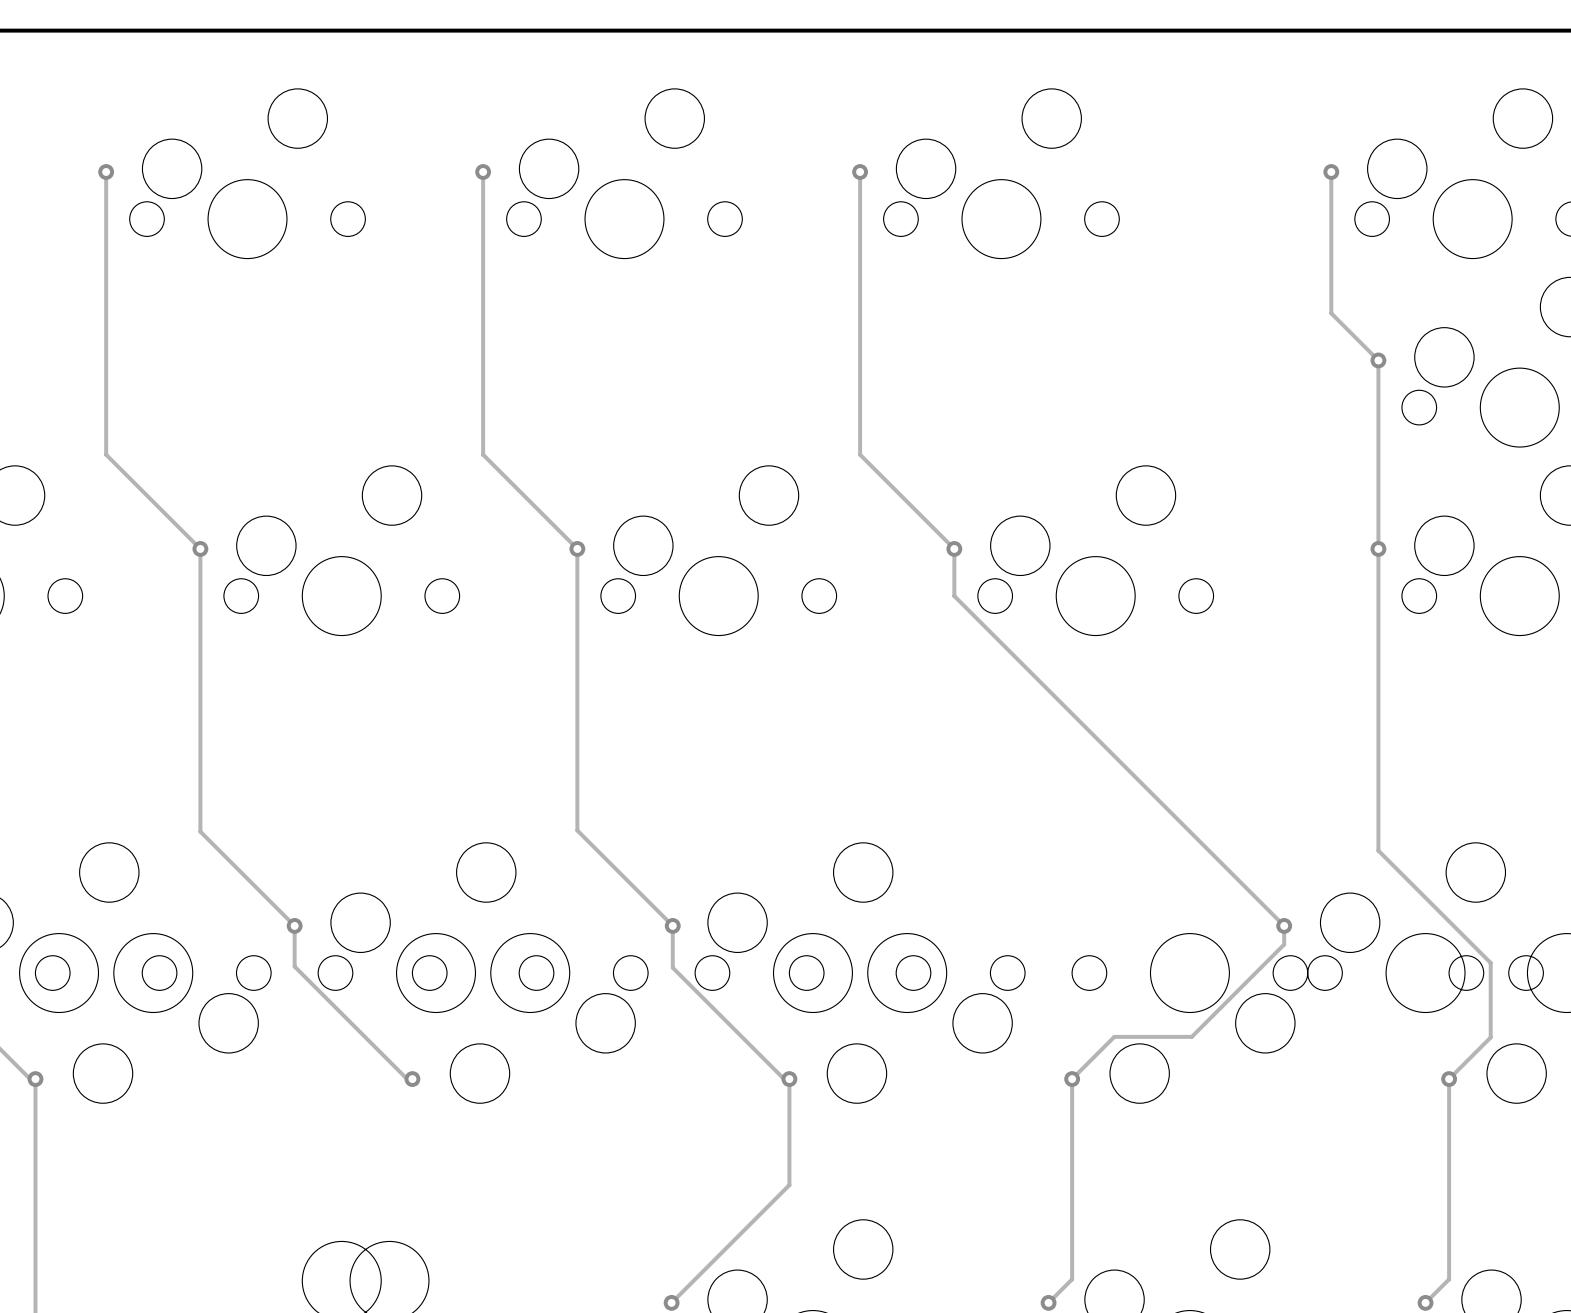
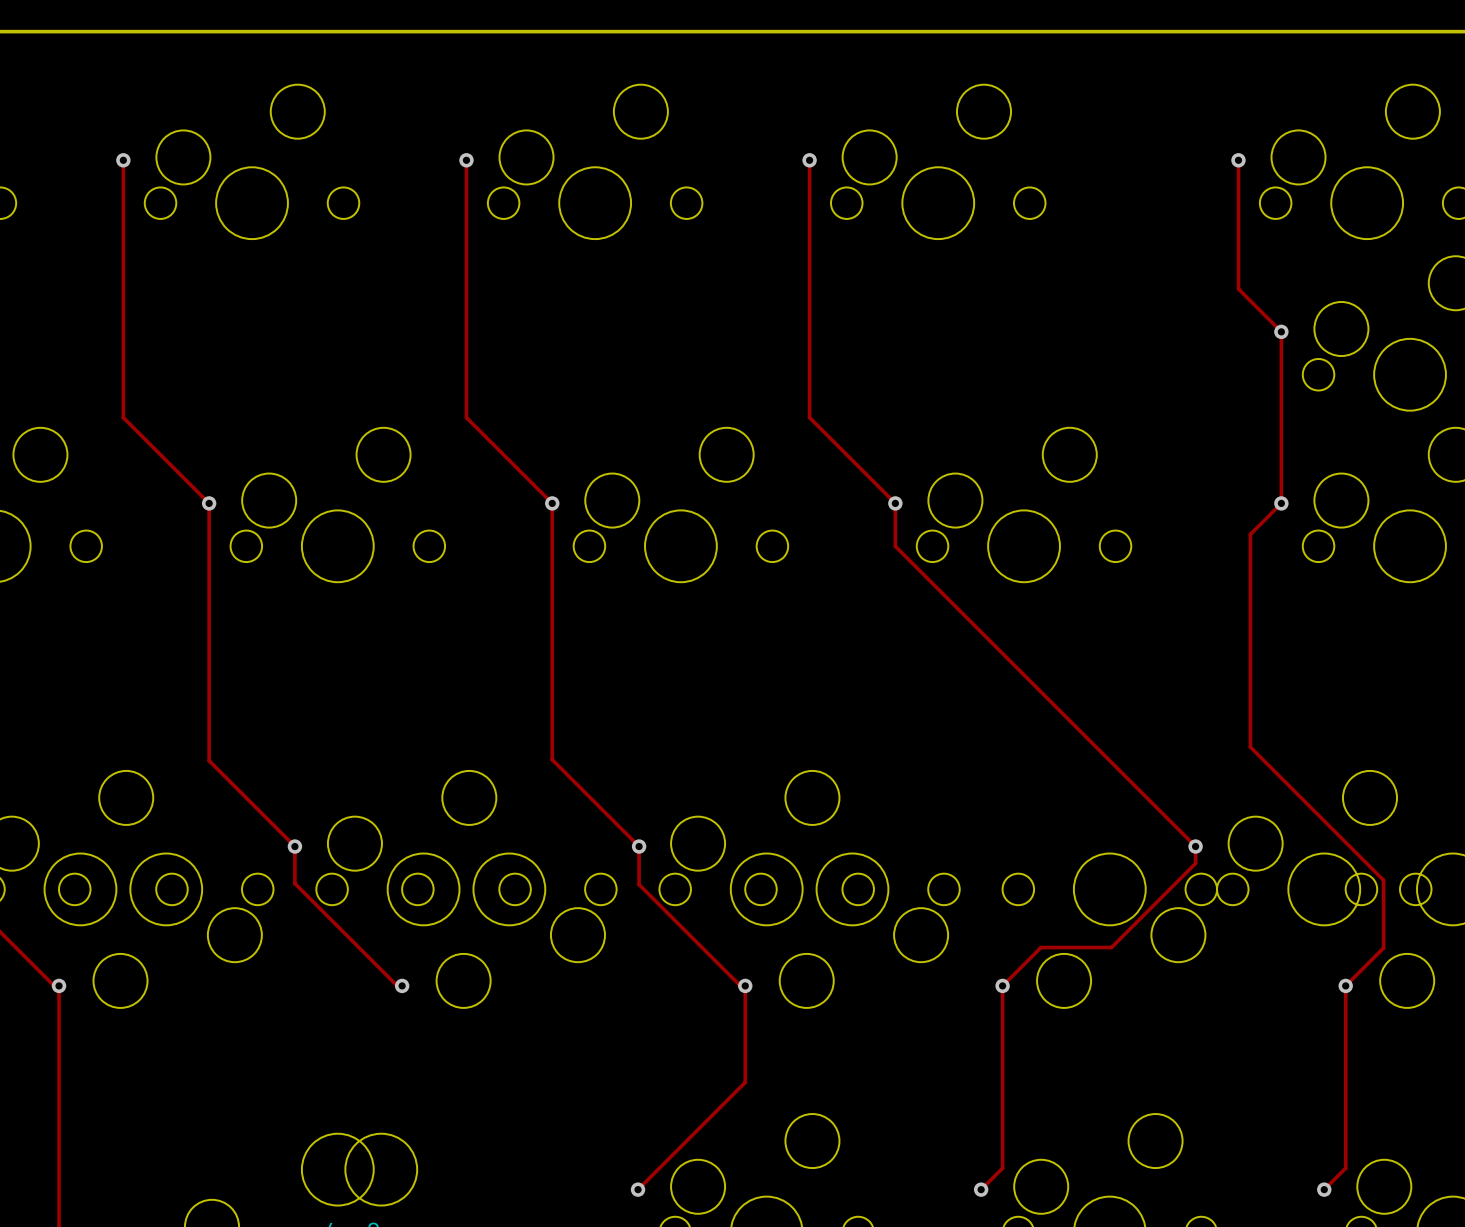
track: (1378, 548) (1378, 850) -> (1281, 503) (1250, 534) (1250, 747) (1281, 778)

